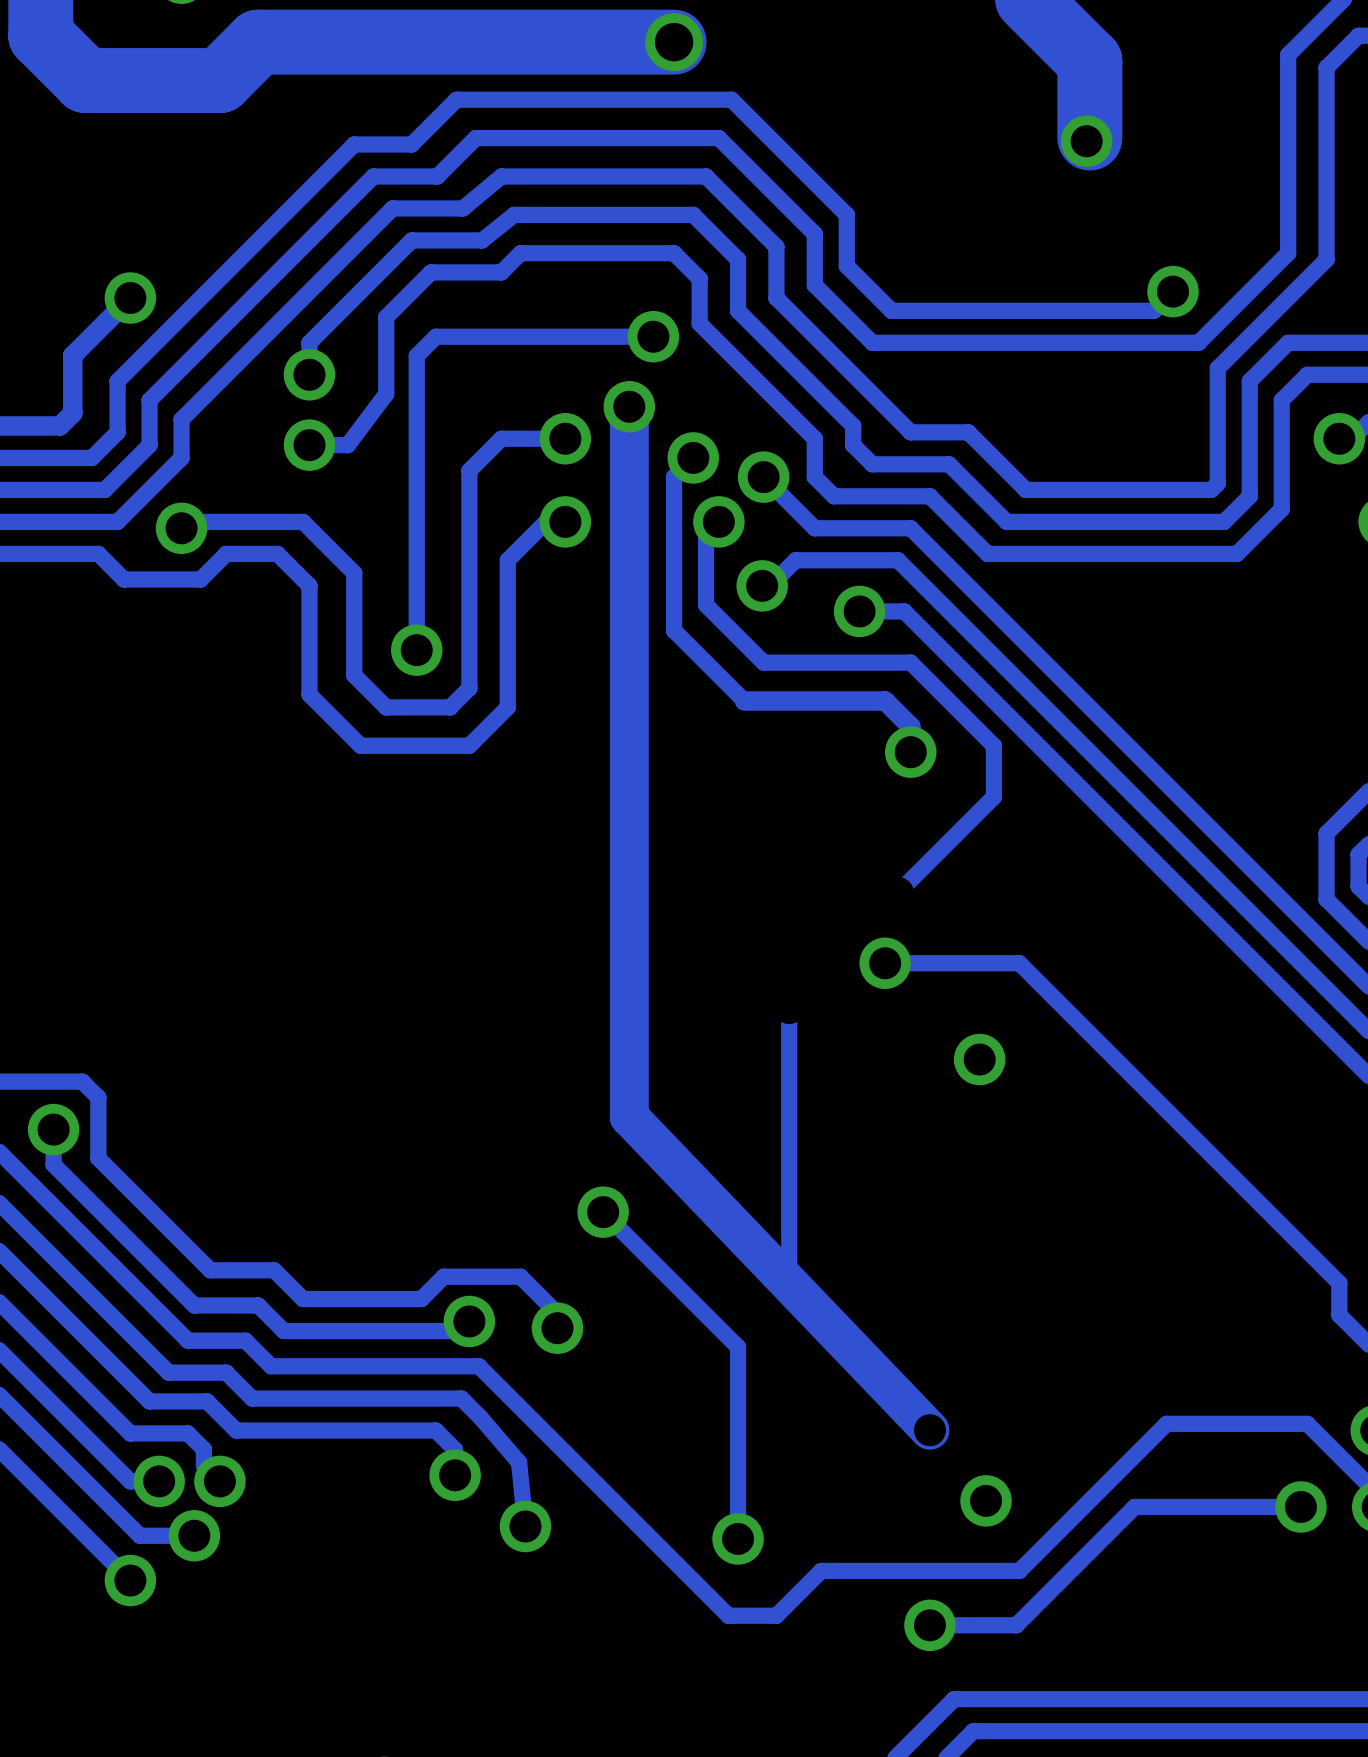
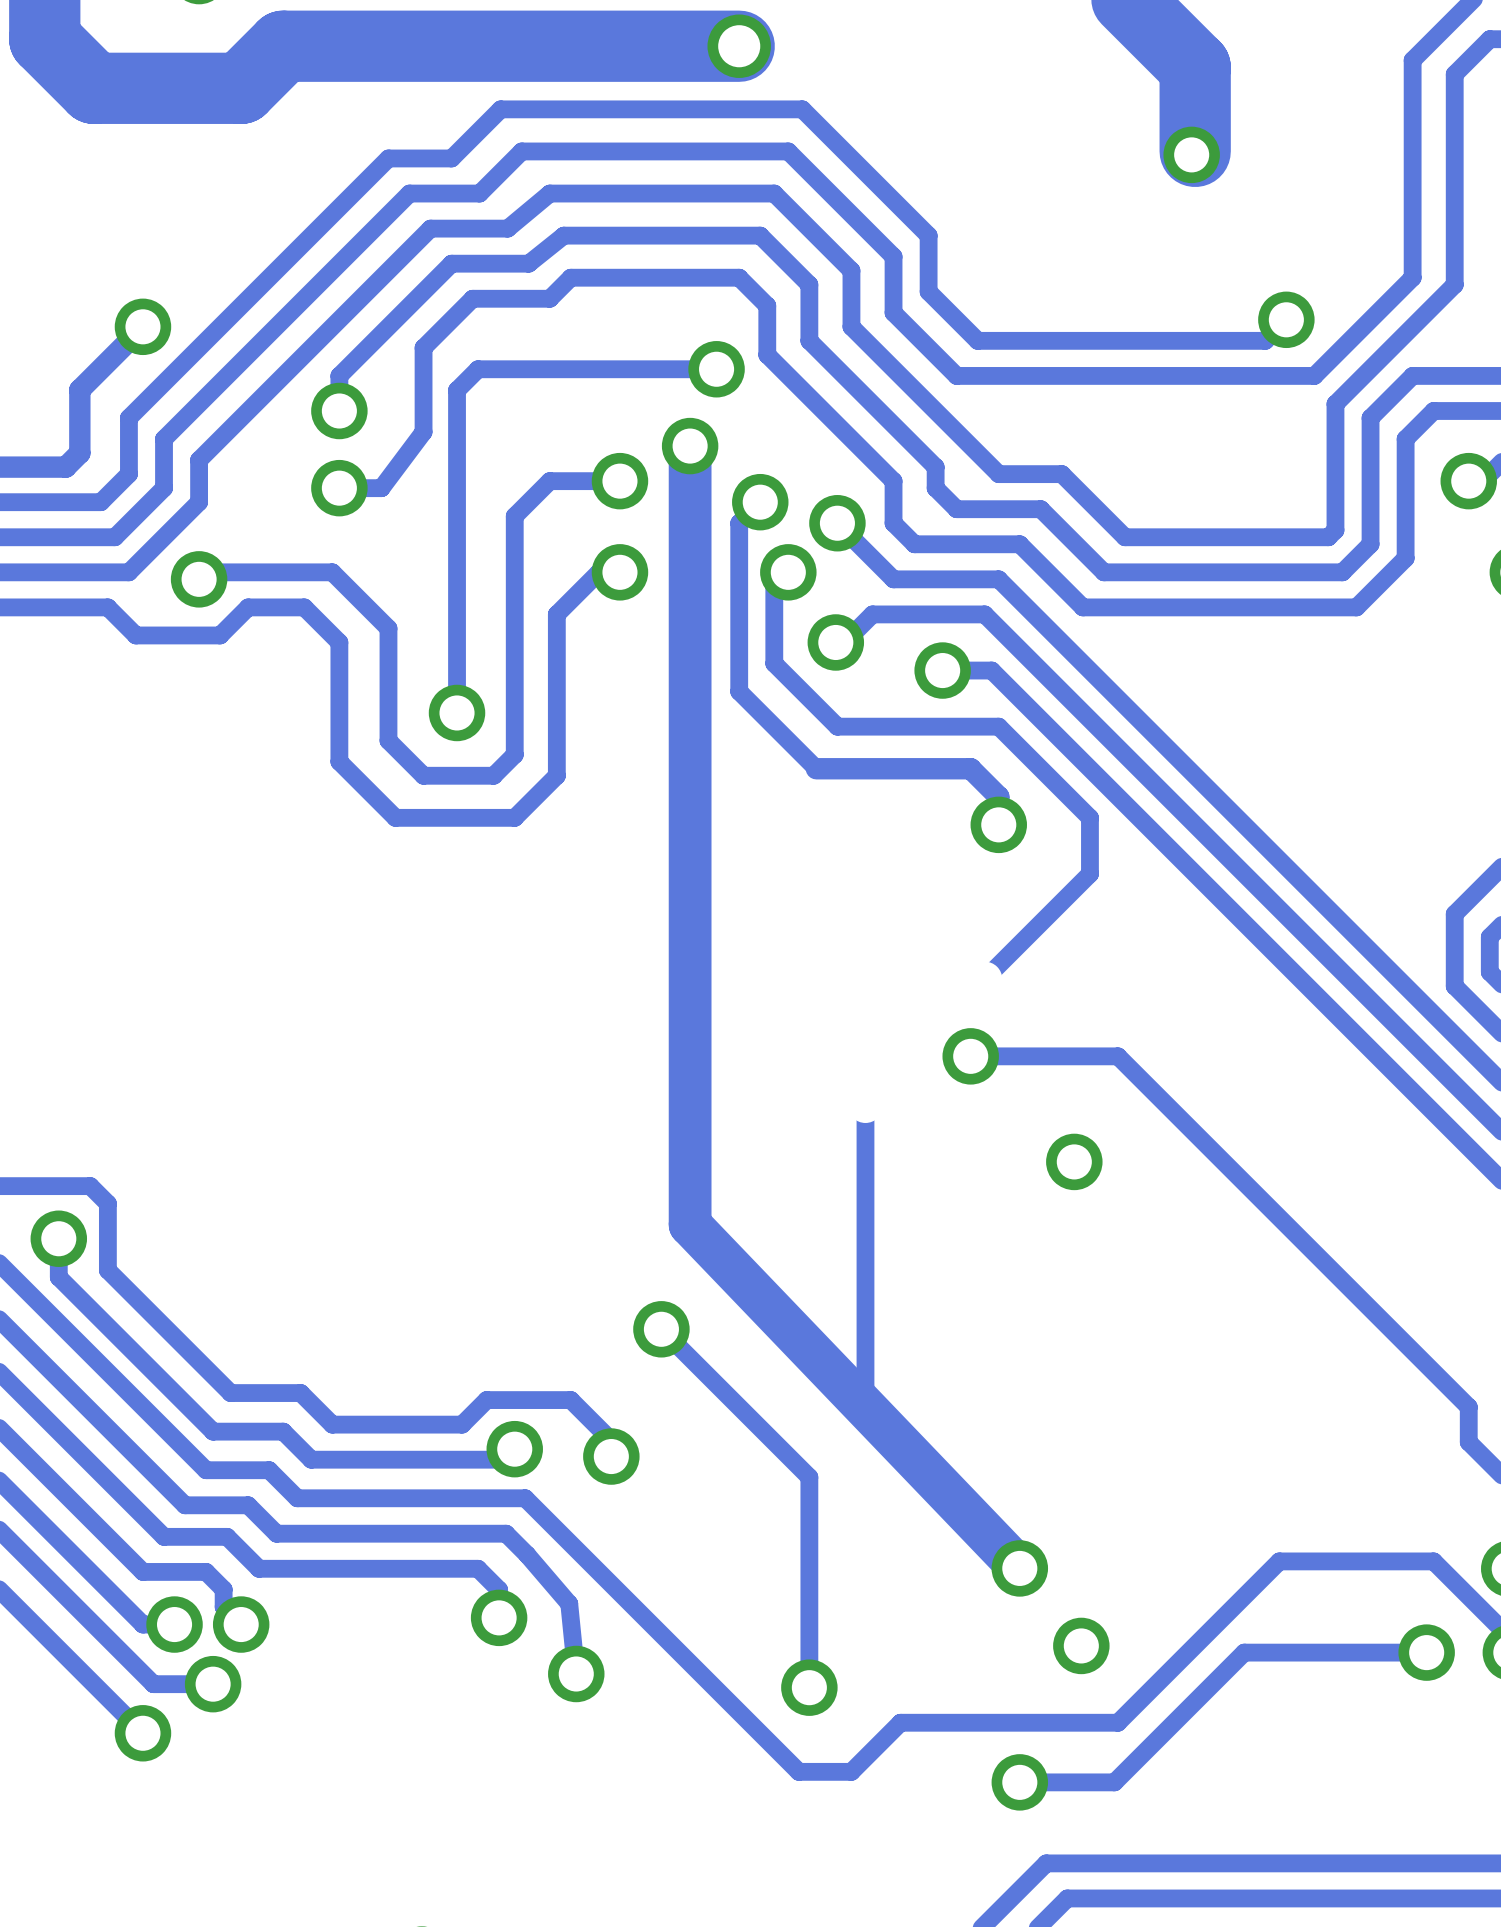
via size: [913, 1414, 946, 1447] -> [991, 1540, 1049, 1597]

